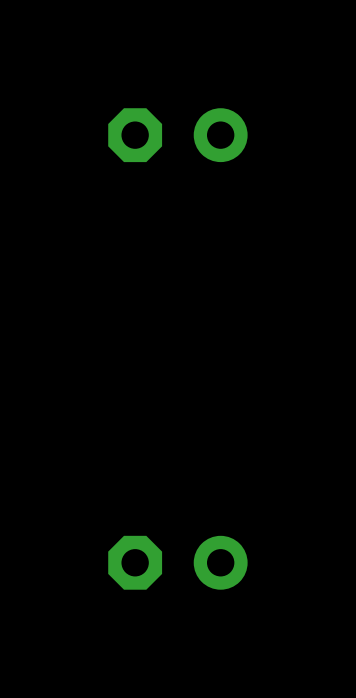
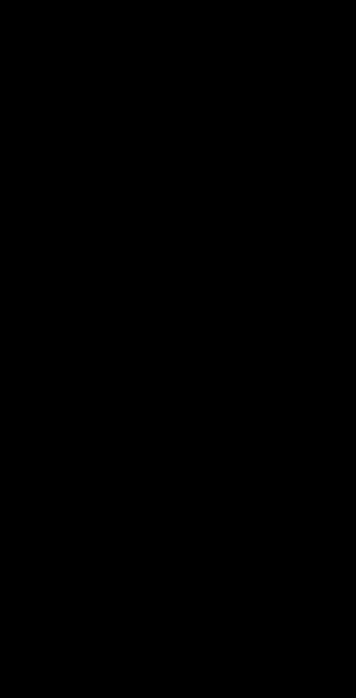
part: (177, 135) -> none
part: (177, 562) -> none

